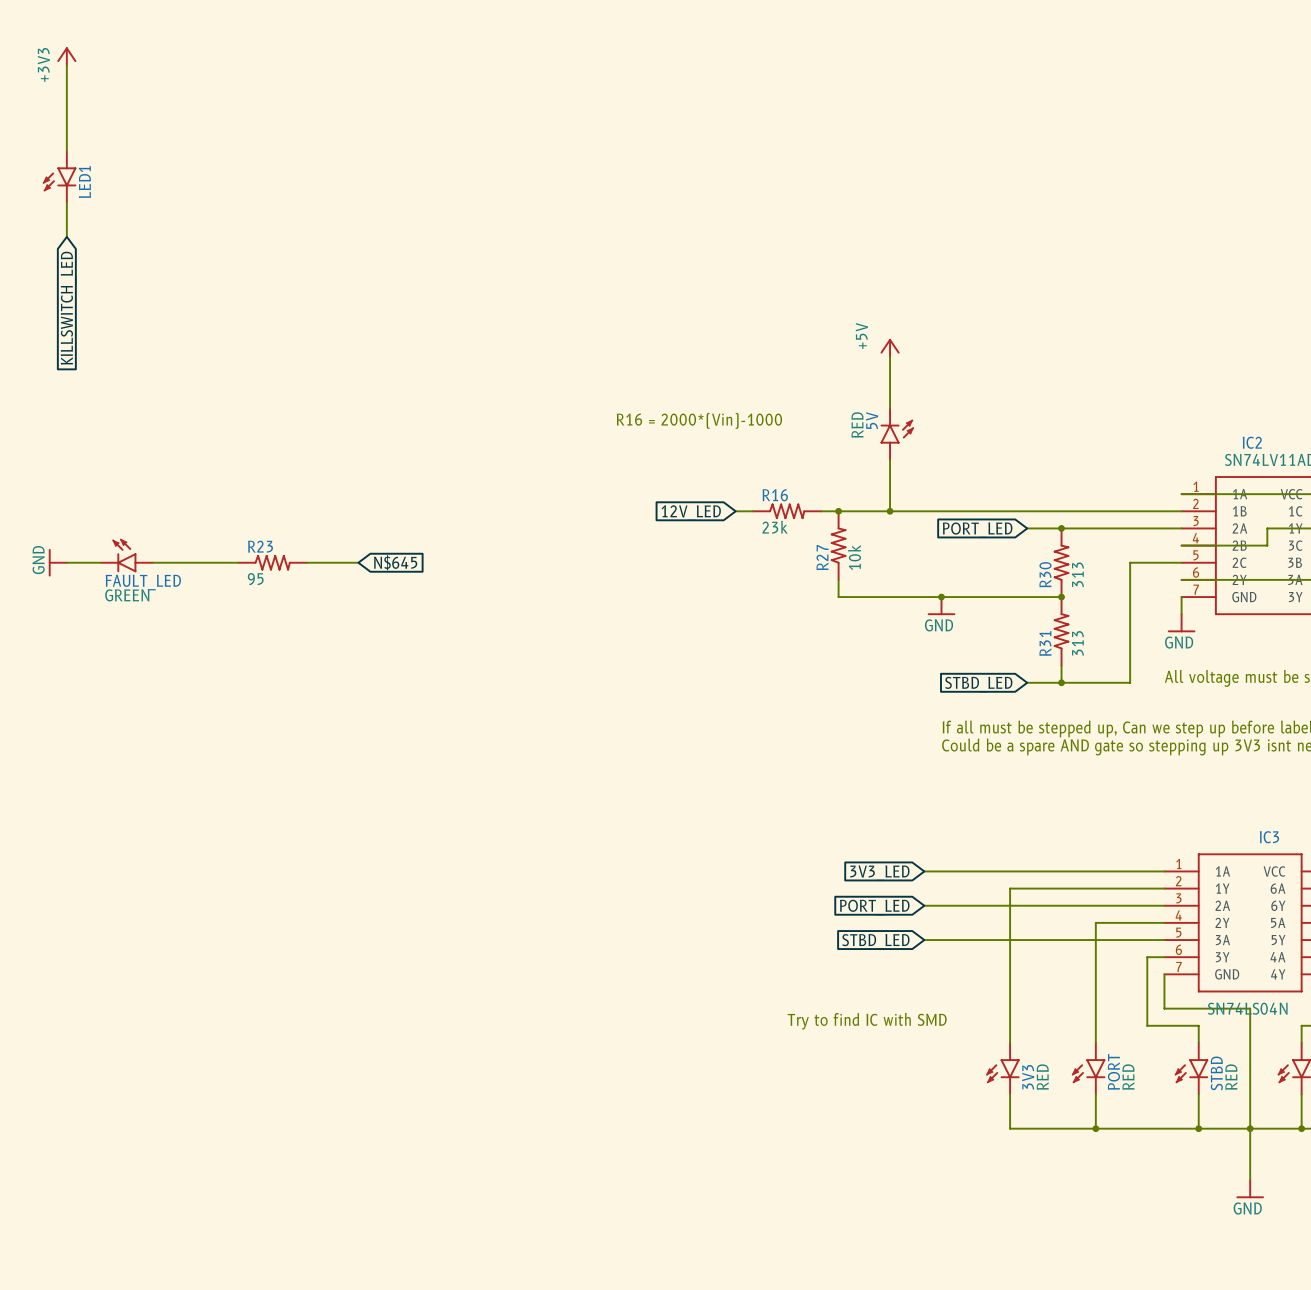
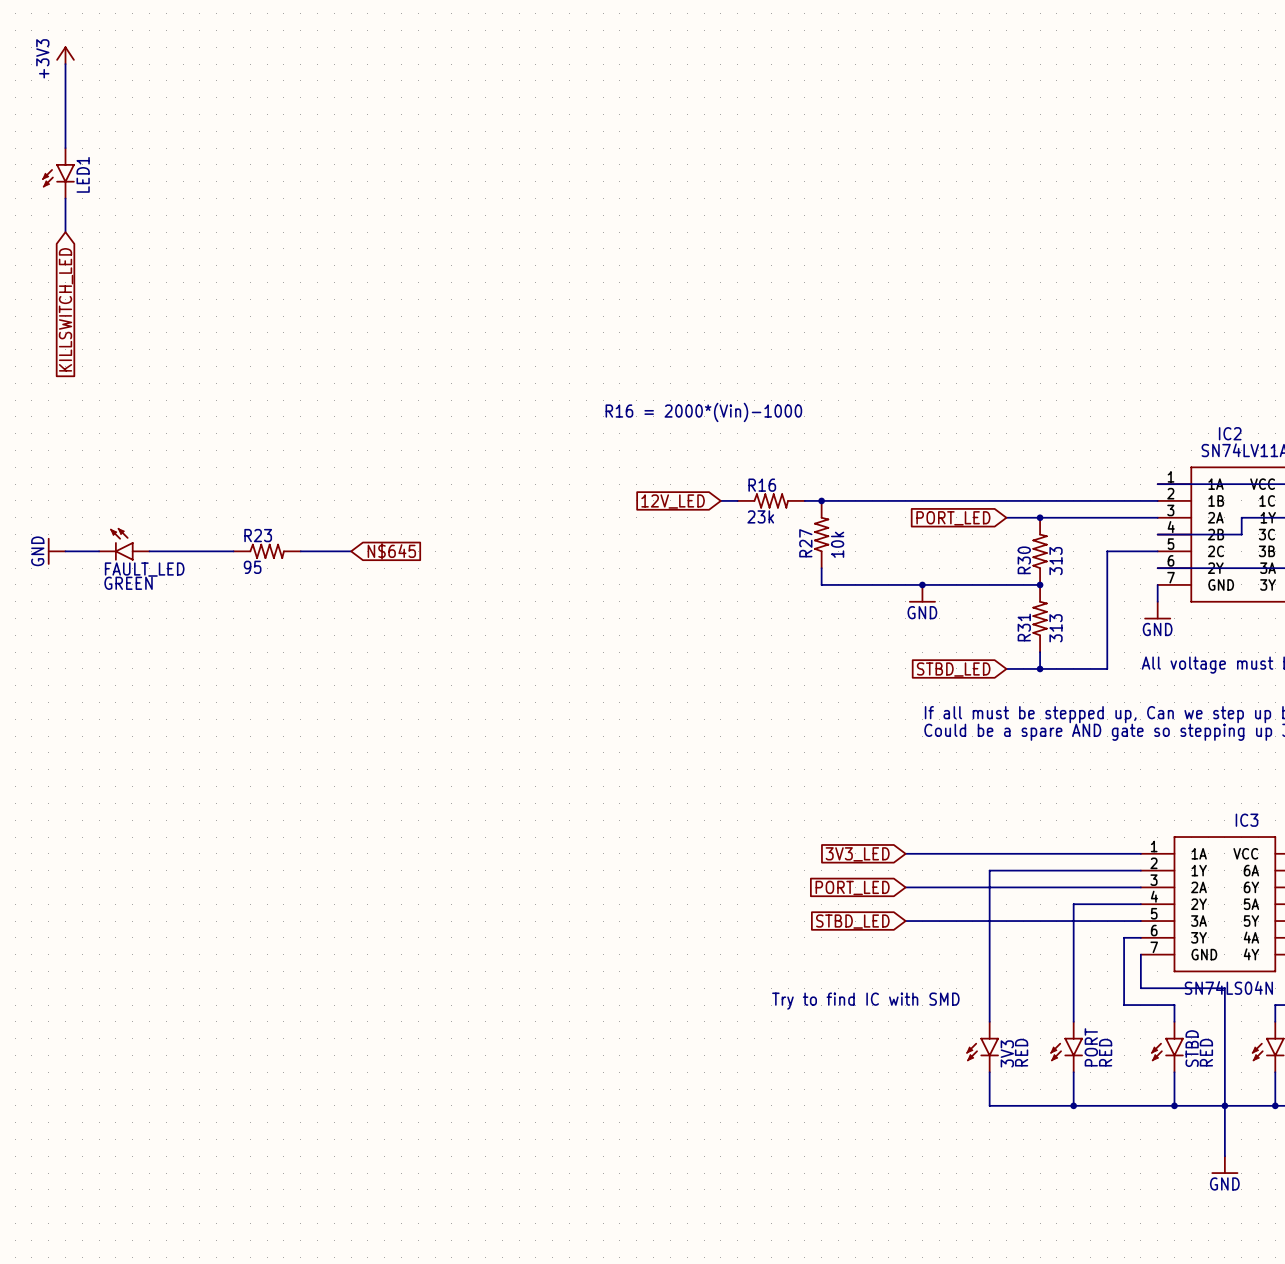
power symbol: +5V (890, 347) -> none
wire: (890, 356) (890, 408) -> none
5V: RED (897, 434) -> none
wire: (890, 459) (890, 511) -> none
junction: (890, 511) -> none

